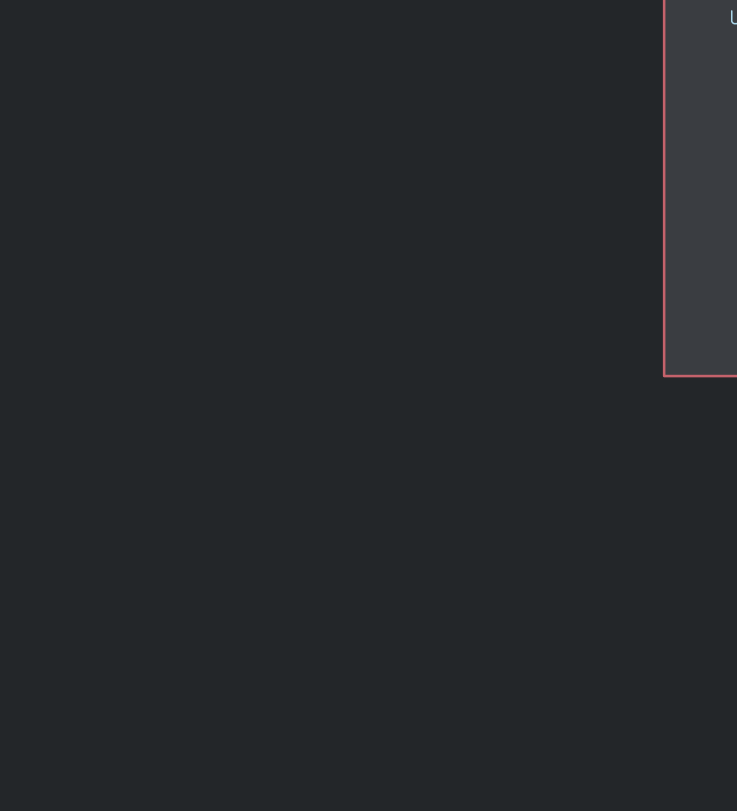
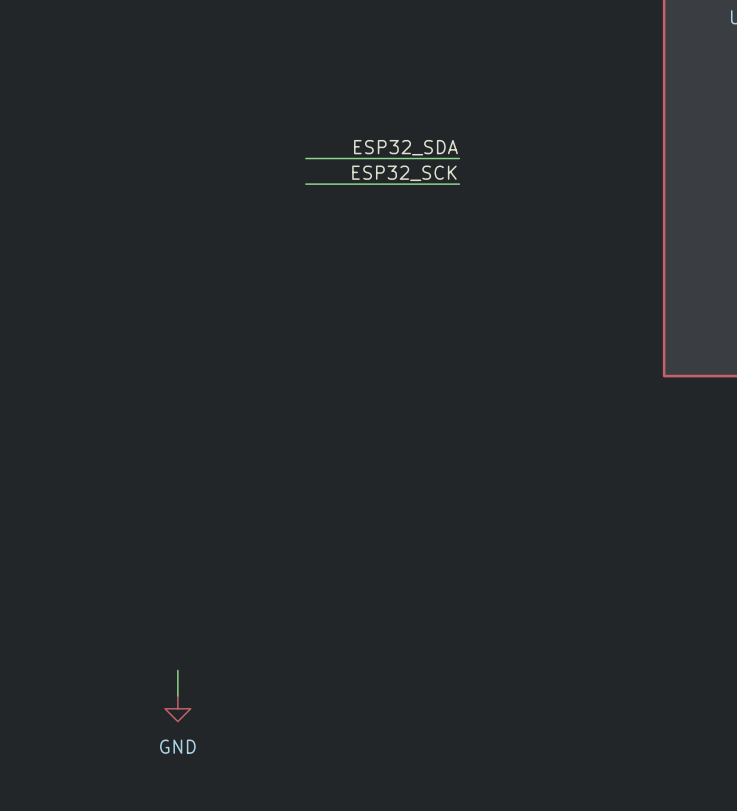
label: none -> ESP32_SDA (405, 147)
wire: none -> (305, 158) (459, 158)
label: none -> ESP32_SCK (404, 173)
wire: none -> (305, 184) (459, 184)
wire: none -> (177, 670) (177, 695)
power symbol: none -> GND (177, 708)

